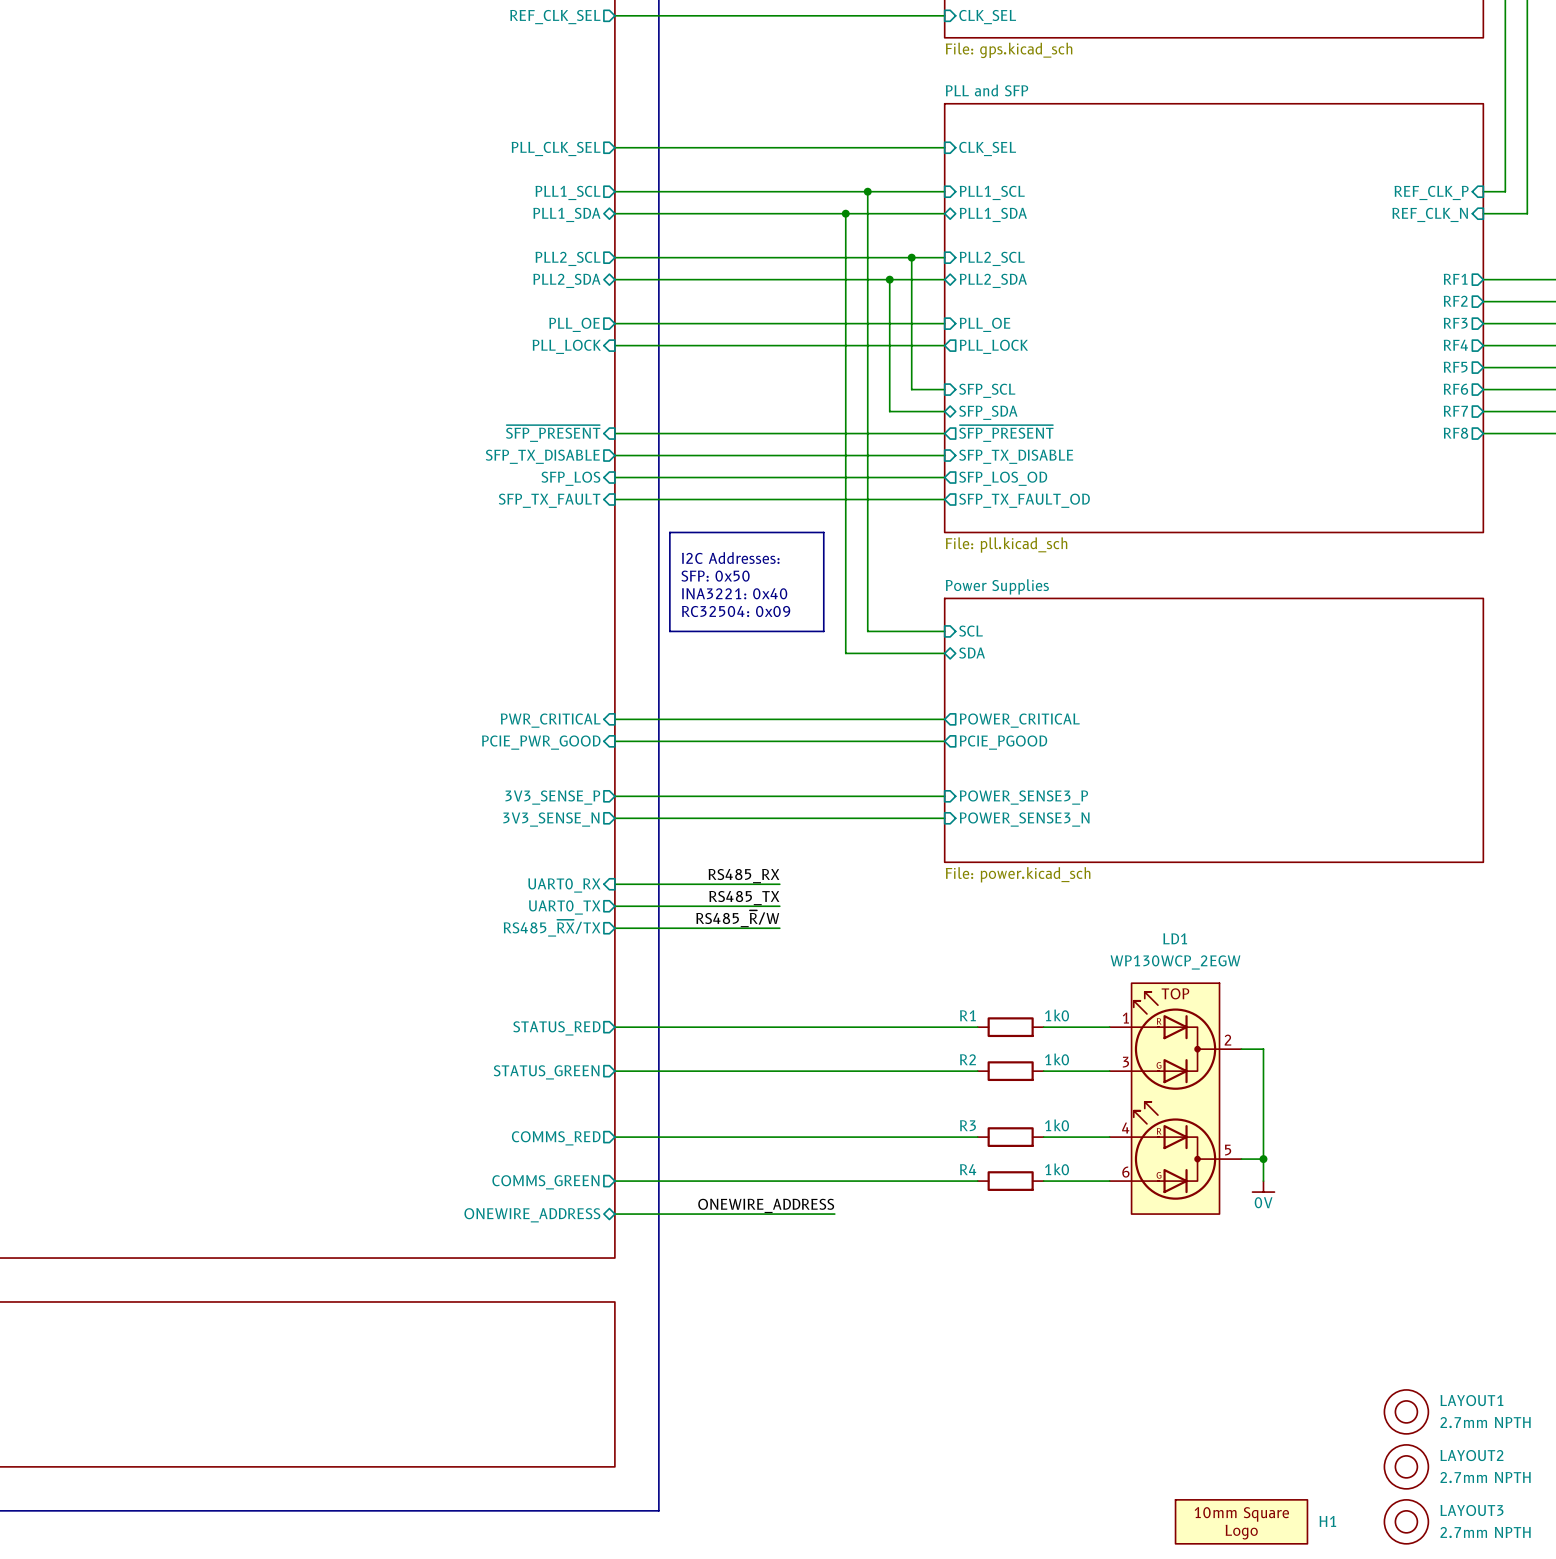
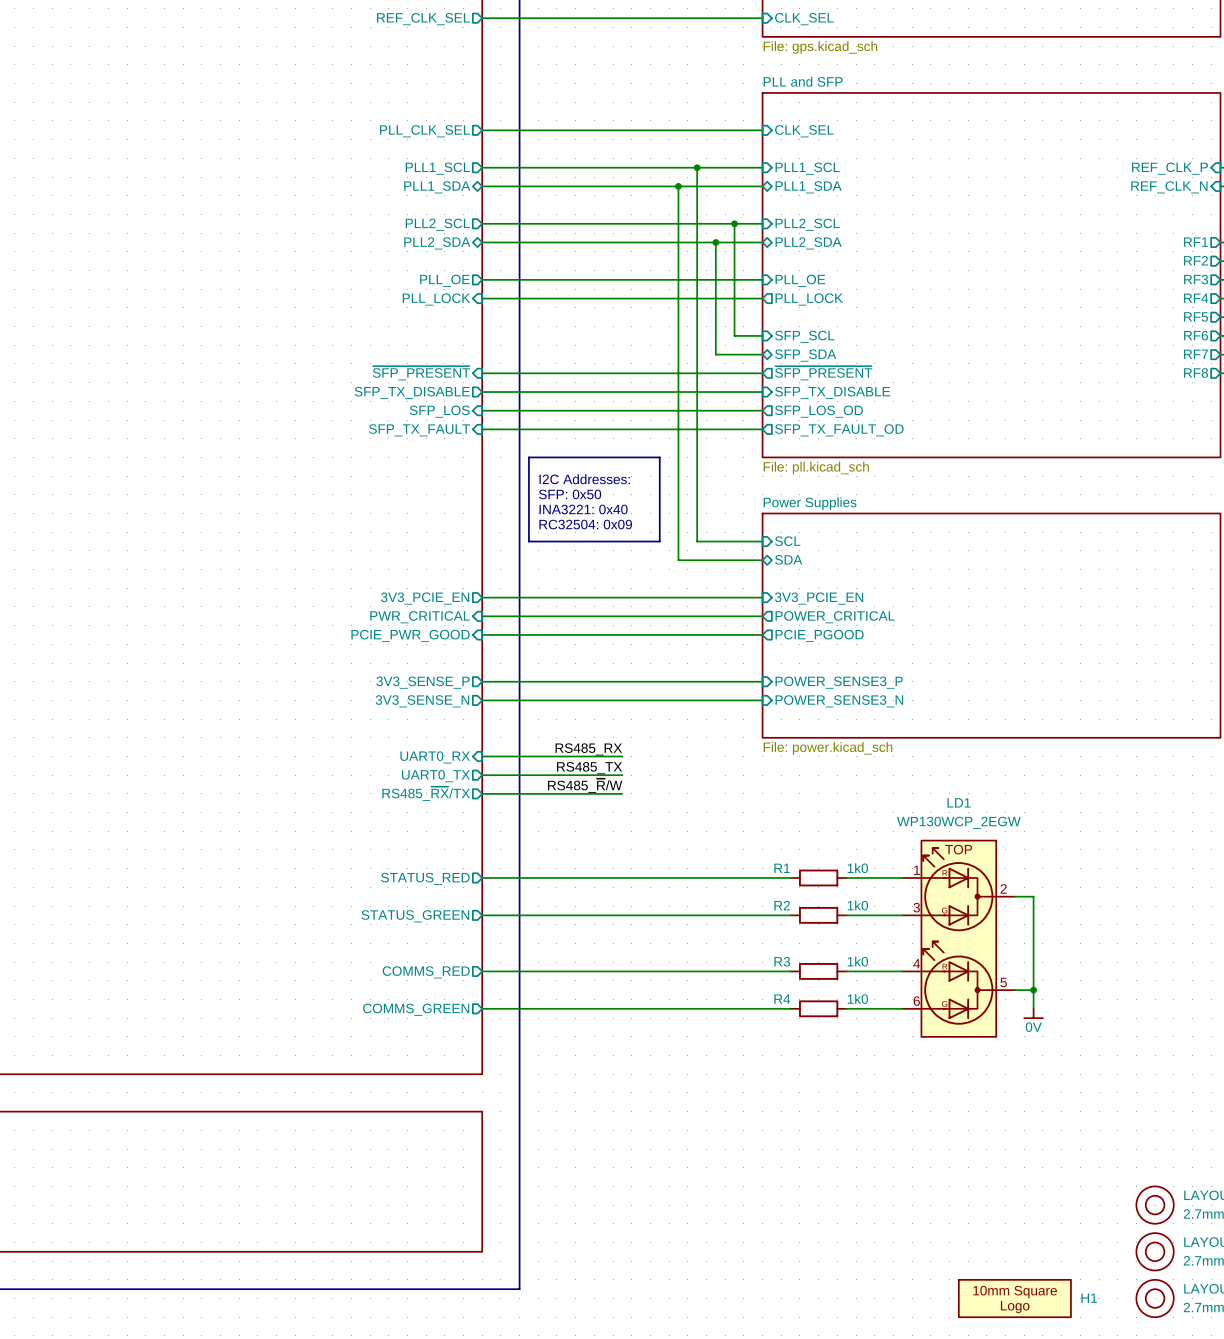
wire: none -> (482, 597) (762, 597)
sheet pin: none -> 3V3_PCIE_EN (425, 598)
sheet pin: none -> 3V3_PCIE_EN (819, 598)
label: ONEWIRE_ADDRESS (766, 1205) -> none
wire: (614, 1214) (834, 1214) -> none
sheet pin: ONEWIRE_ADDRESS (532, 1215) -> none

